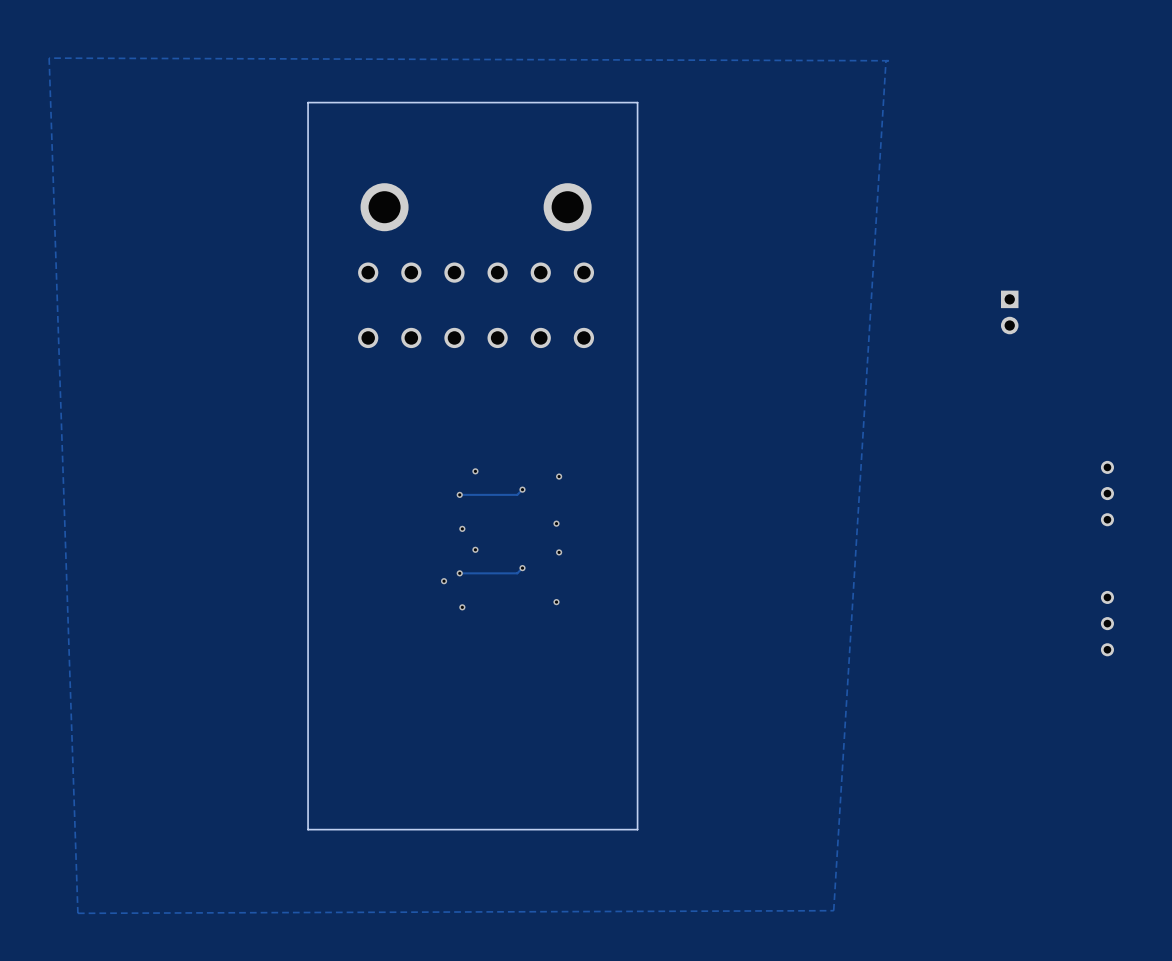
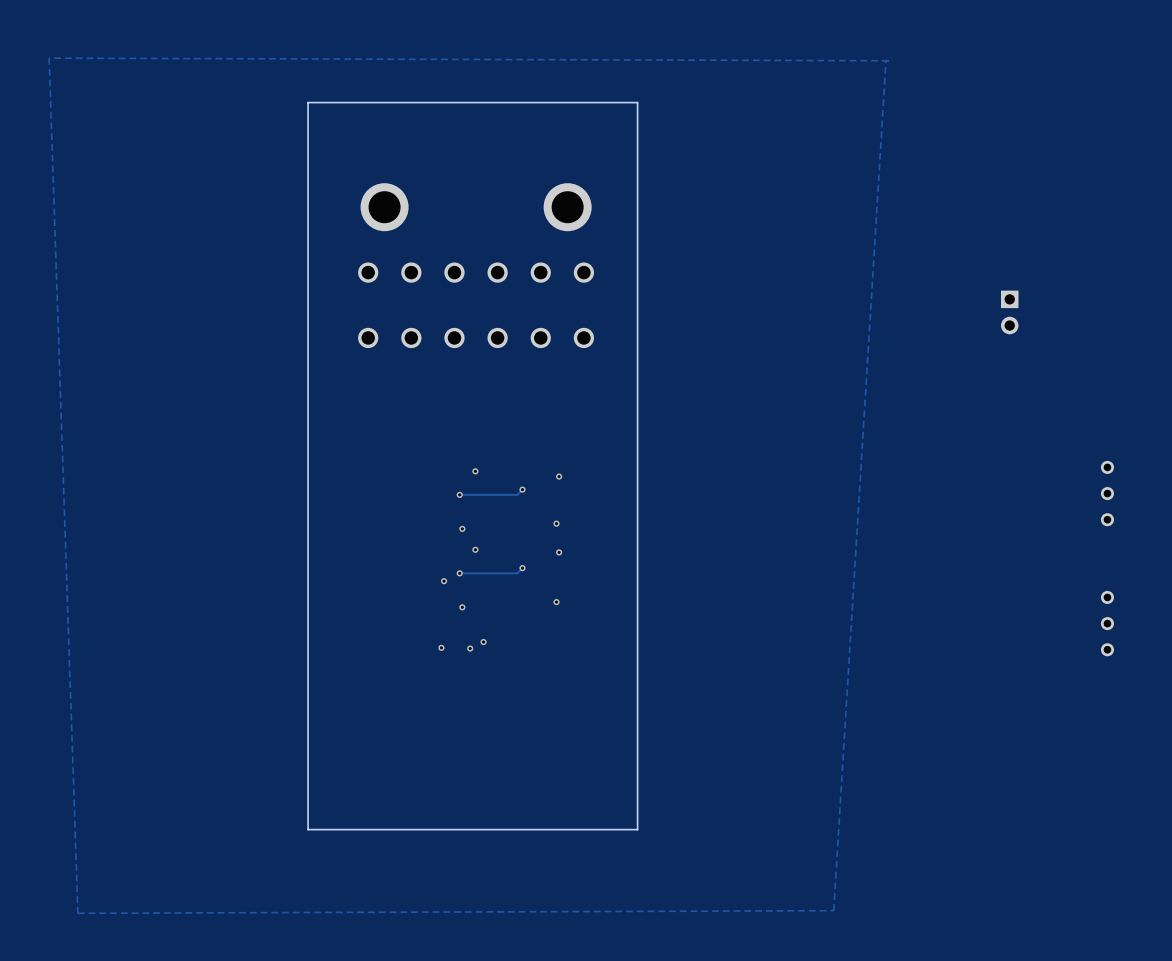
via: none -> (483, 642)
via: none -> (441, 647)
via: none -> (470, 648)

